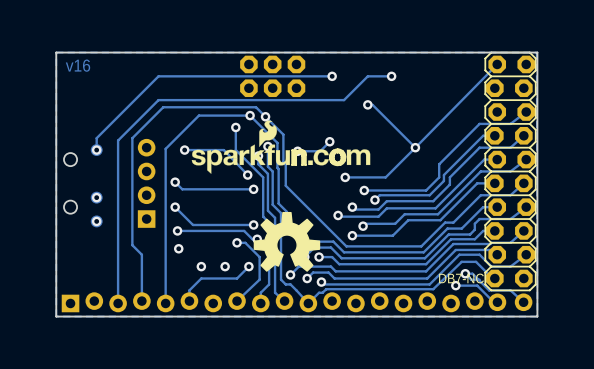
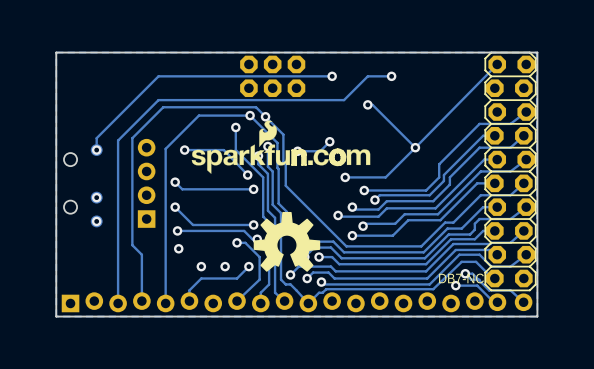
text: v16 (78, 65) -> none

